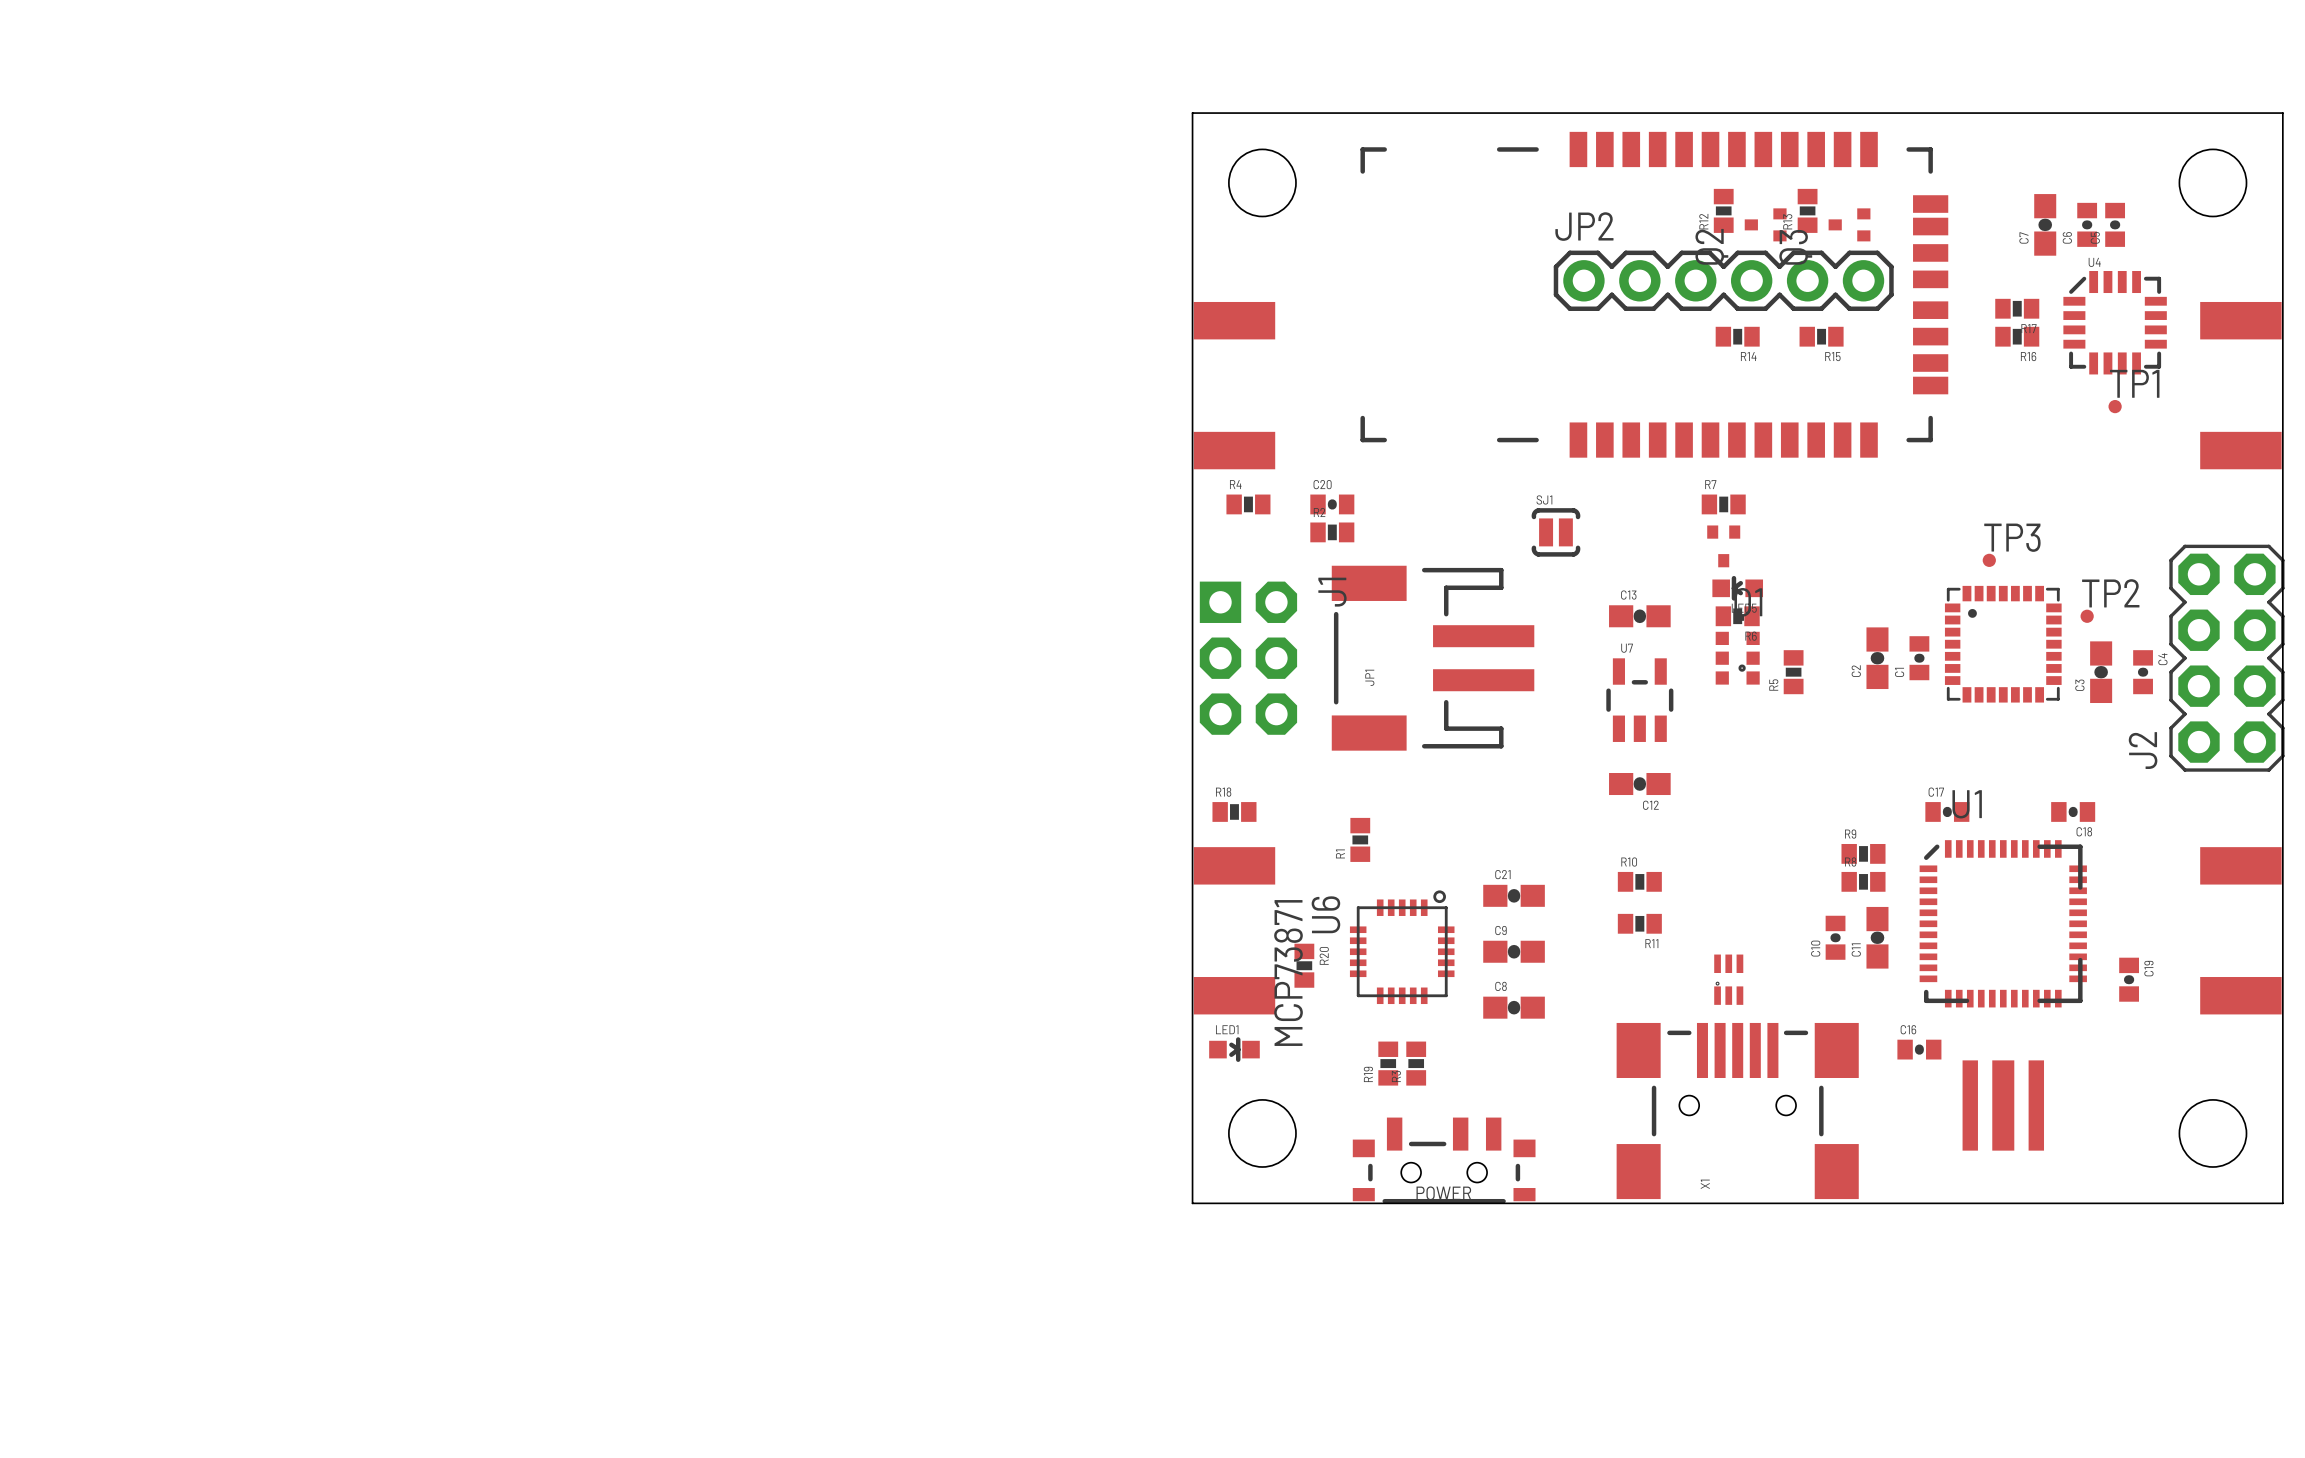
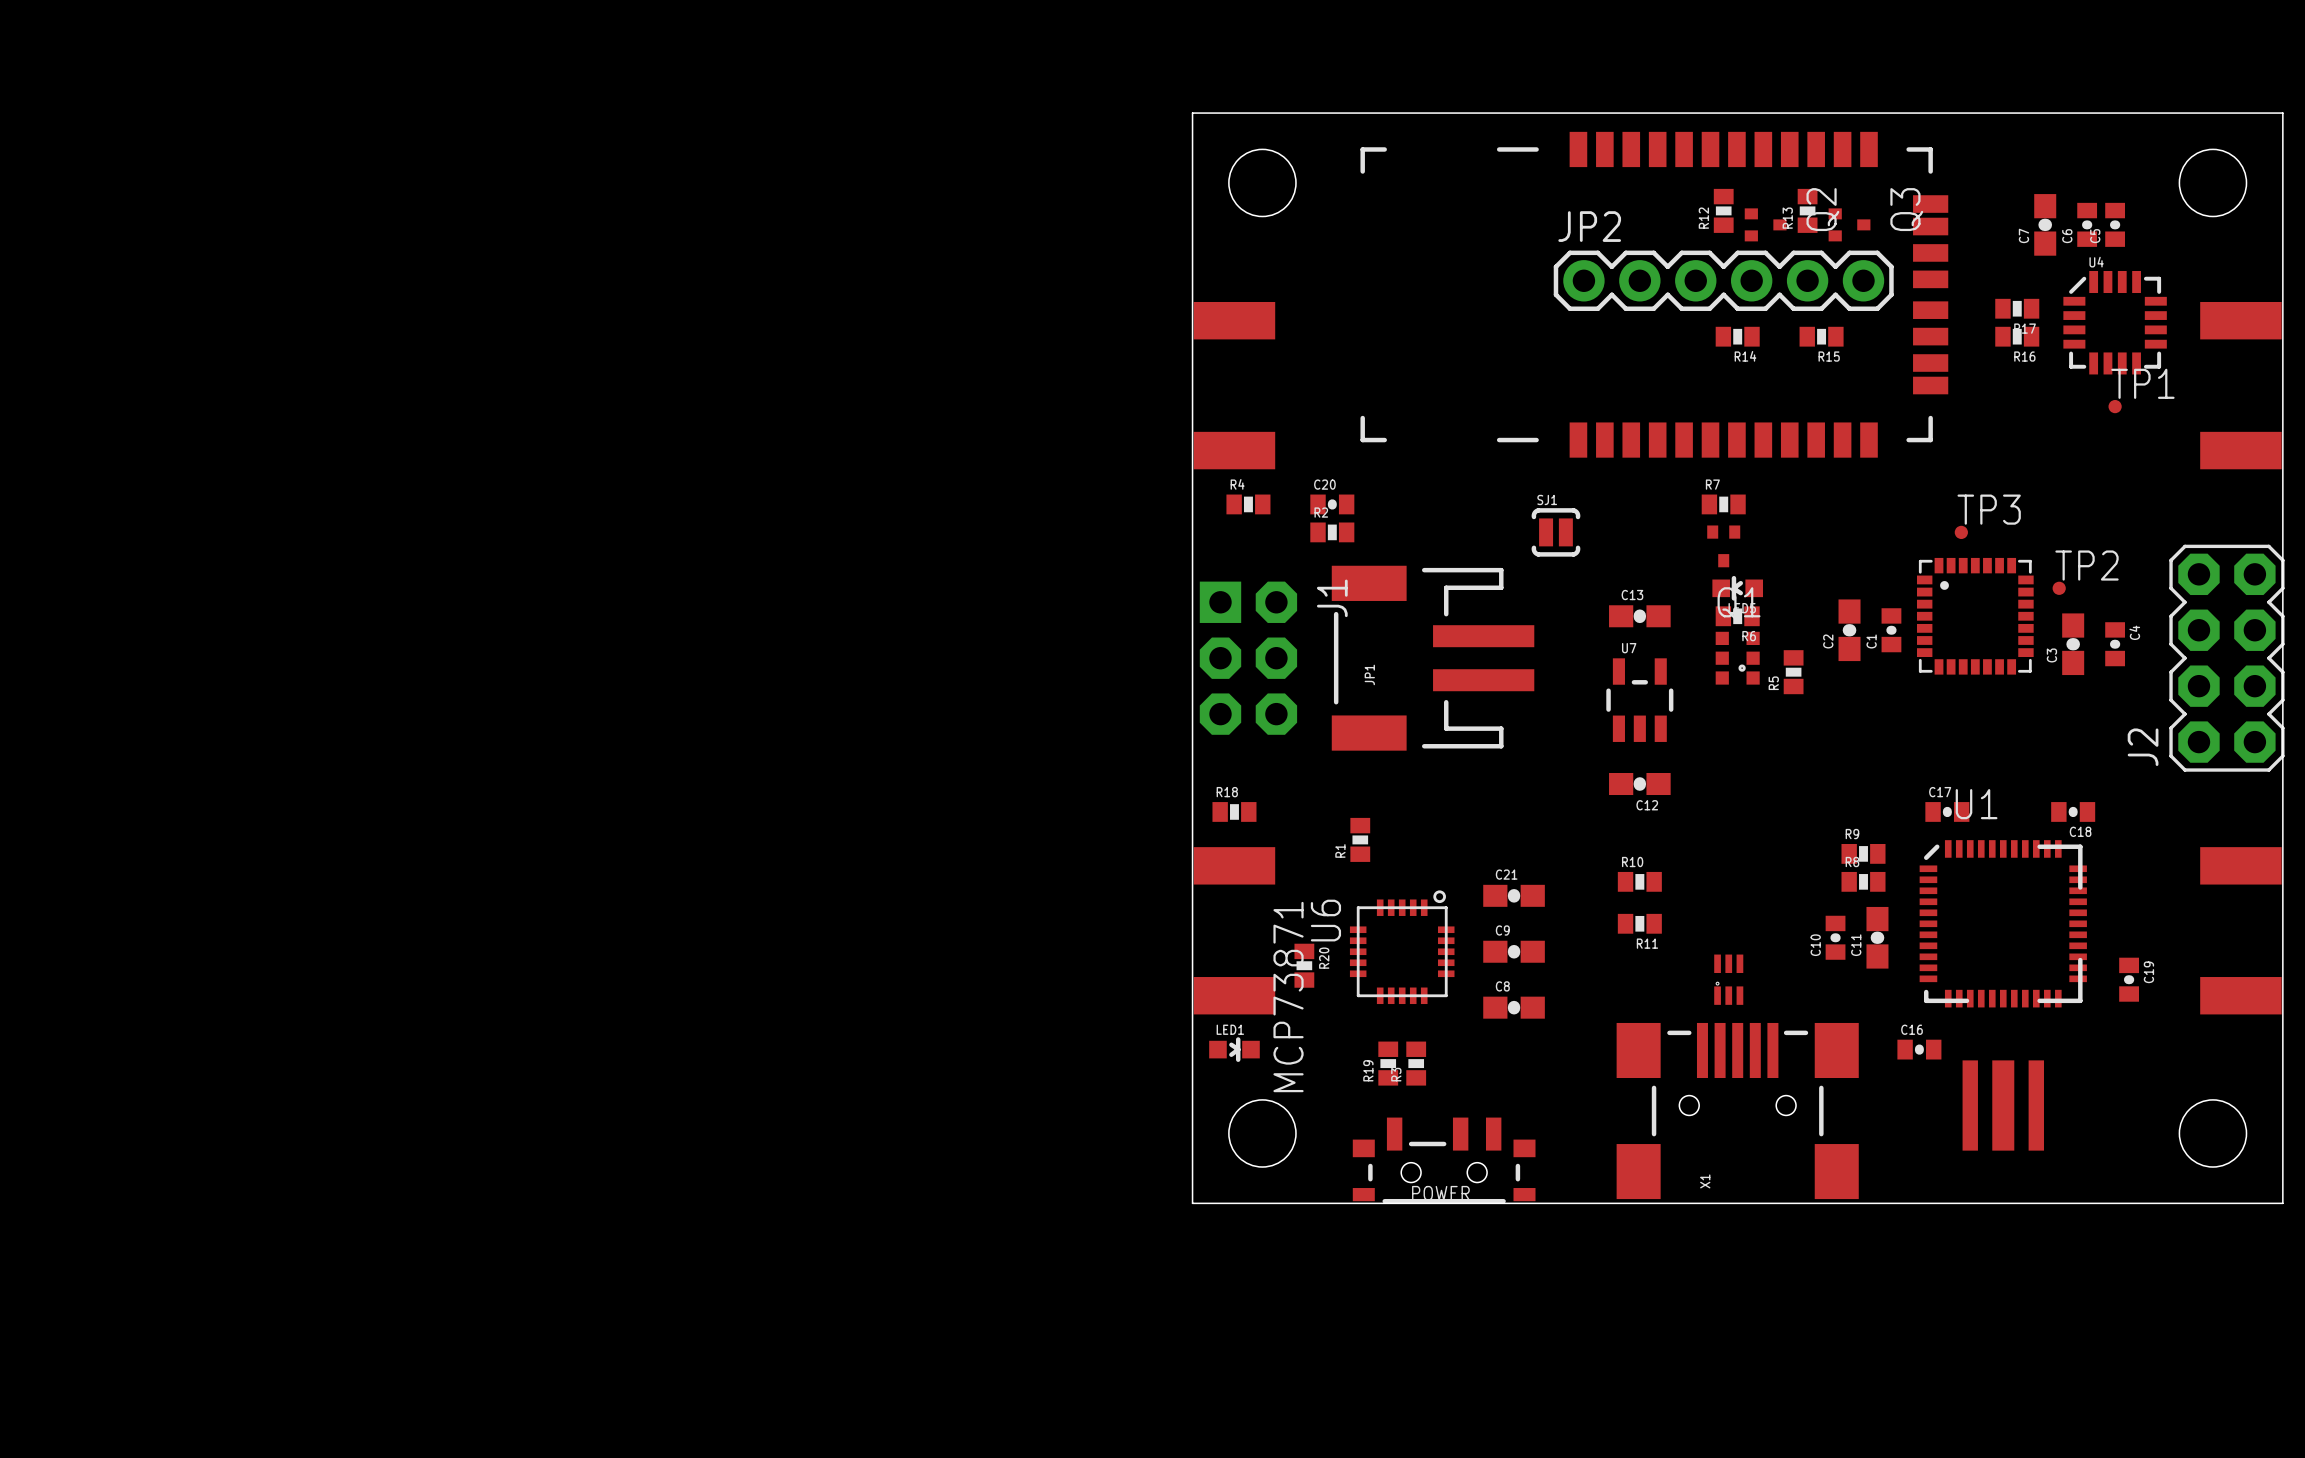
Q2 rotation: 0° (1765, 224) -> 180° (1765, 224)
Q3 rotation: 0° (1849, 224) -> 180° (1849, 224)
TP3 position: (1989, 560) -> (1961, 532)
TP2 position: (2087, 616) -> (2059, 588)
part position: (2003, 644) -> (1975, 616)
C2 position: (1877, 658) -> (1849, 630)
C1 position: (1919, 658) -> (1891, 630)
C3 position: (2101, 672) -> (2073, 644)
C4 position: (2143, 672) -> (2115, 644)

